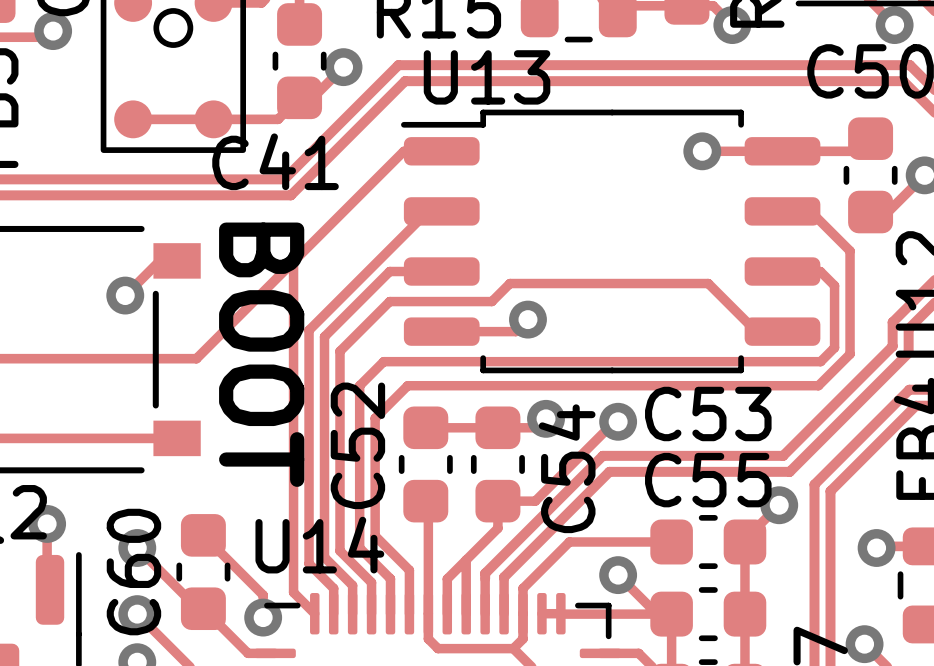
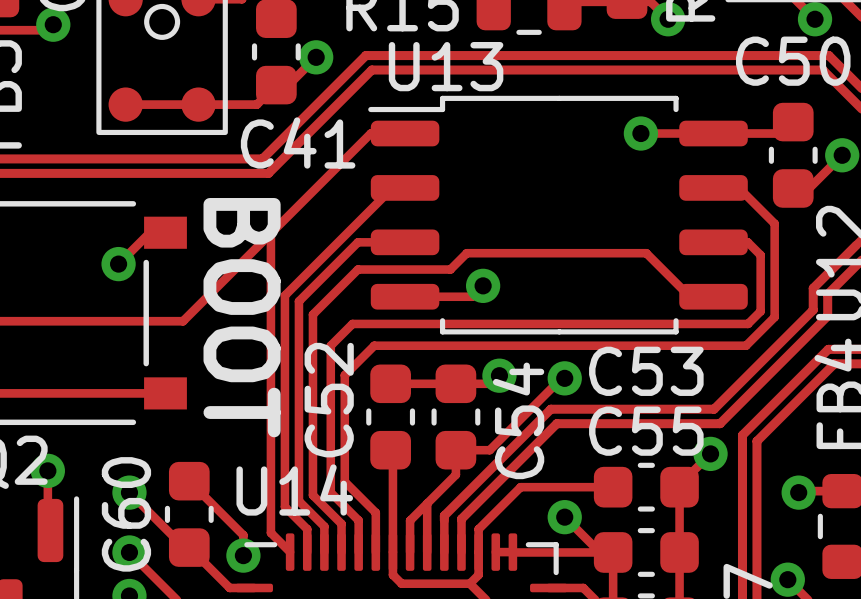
C41 name position: C41 (275, 161) -> C41 (298, 143)

